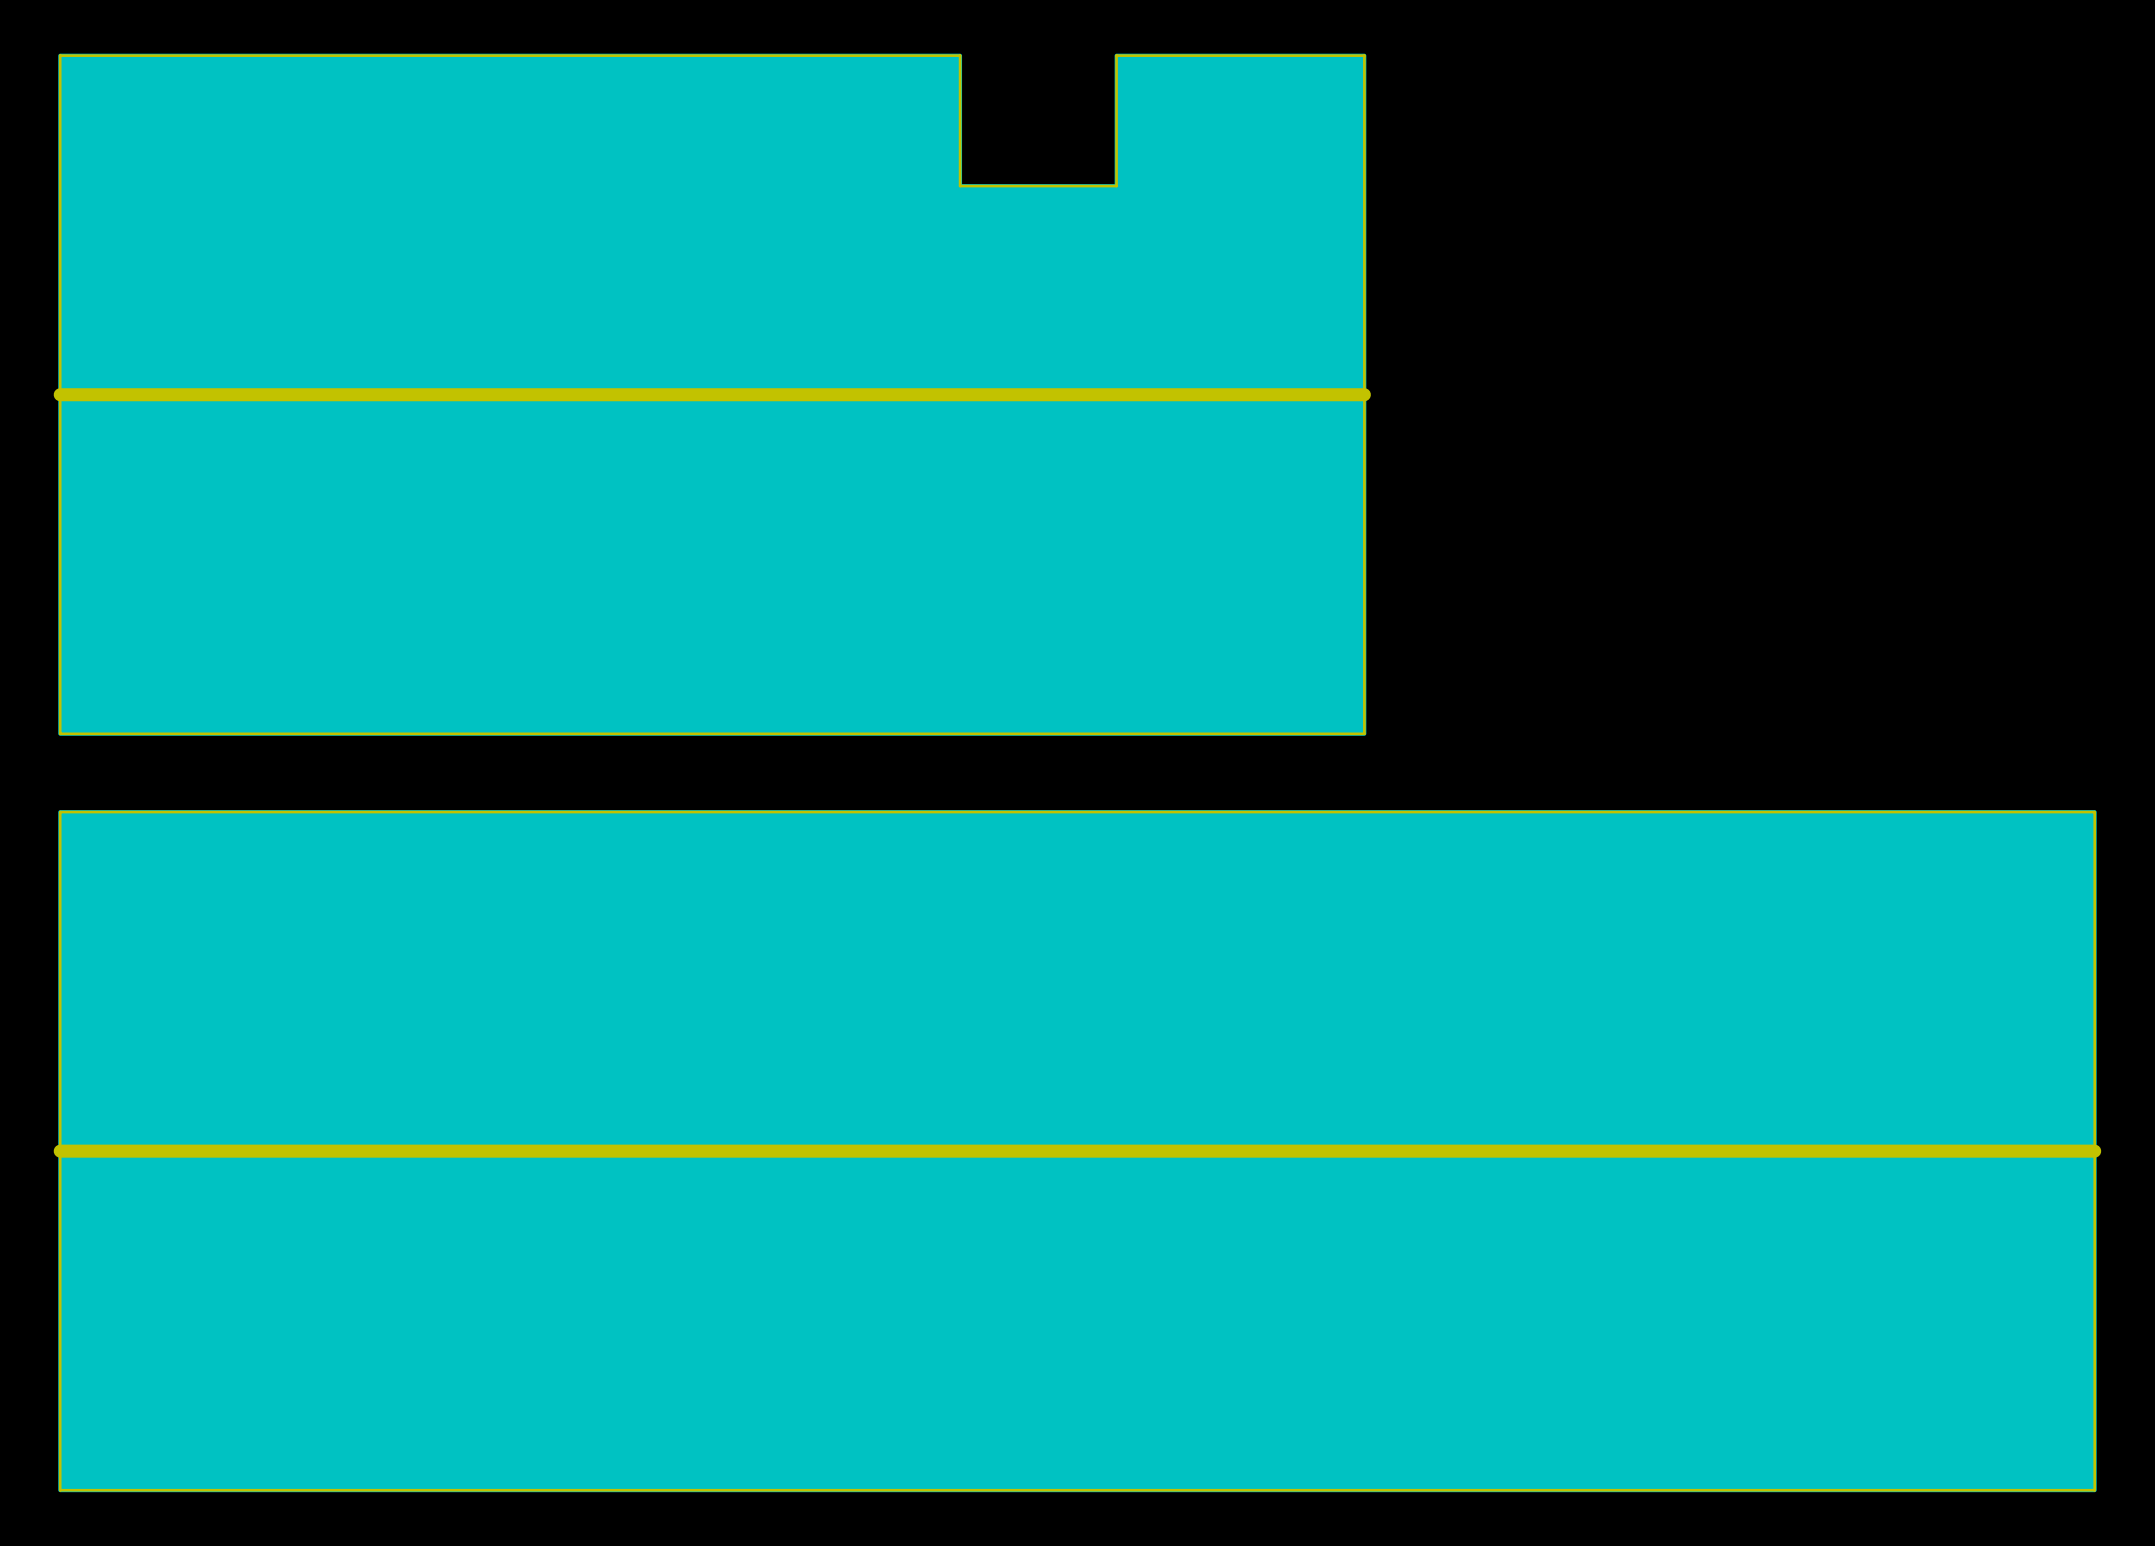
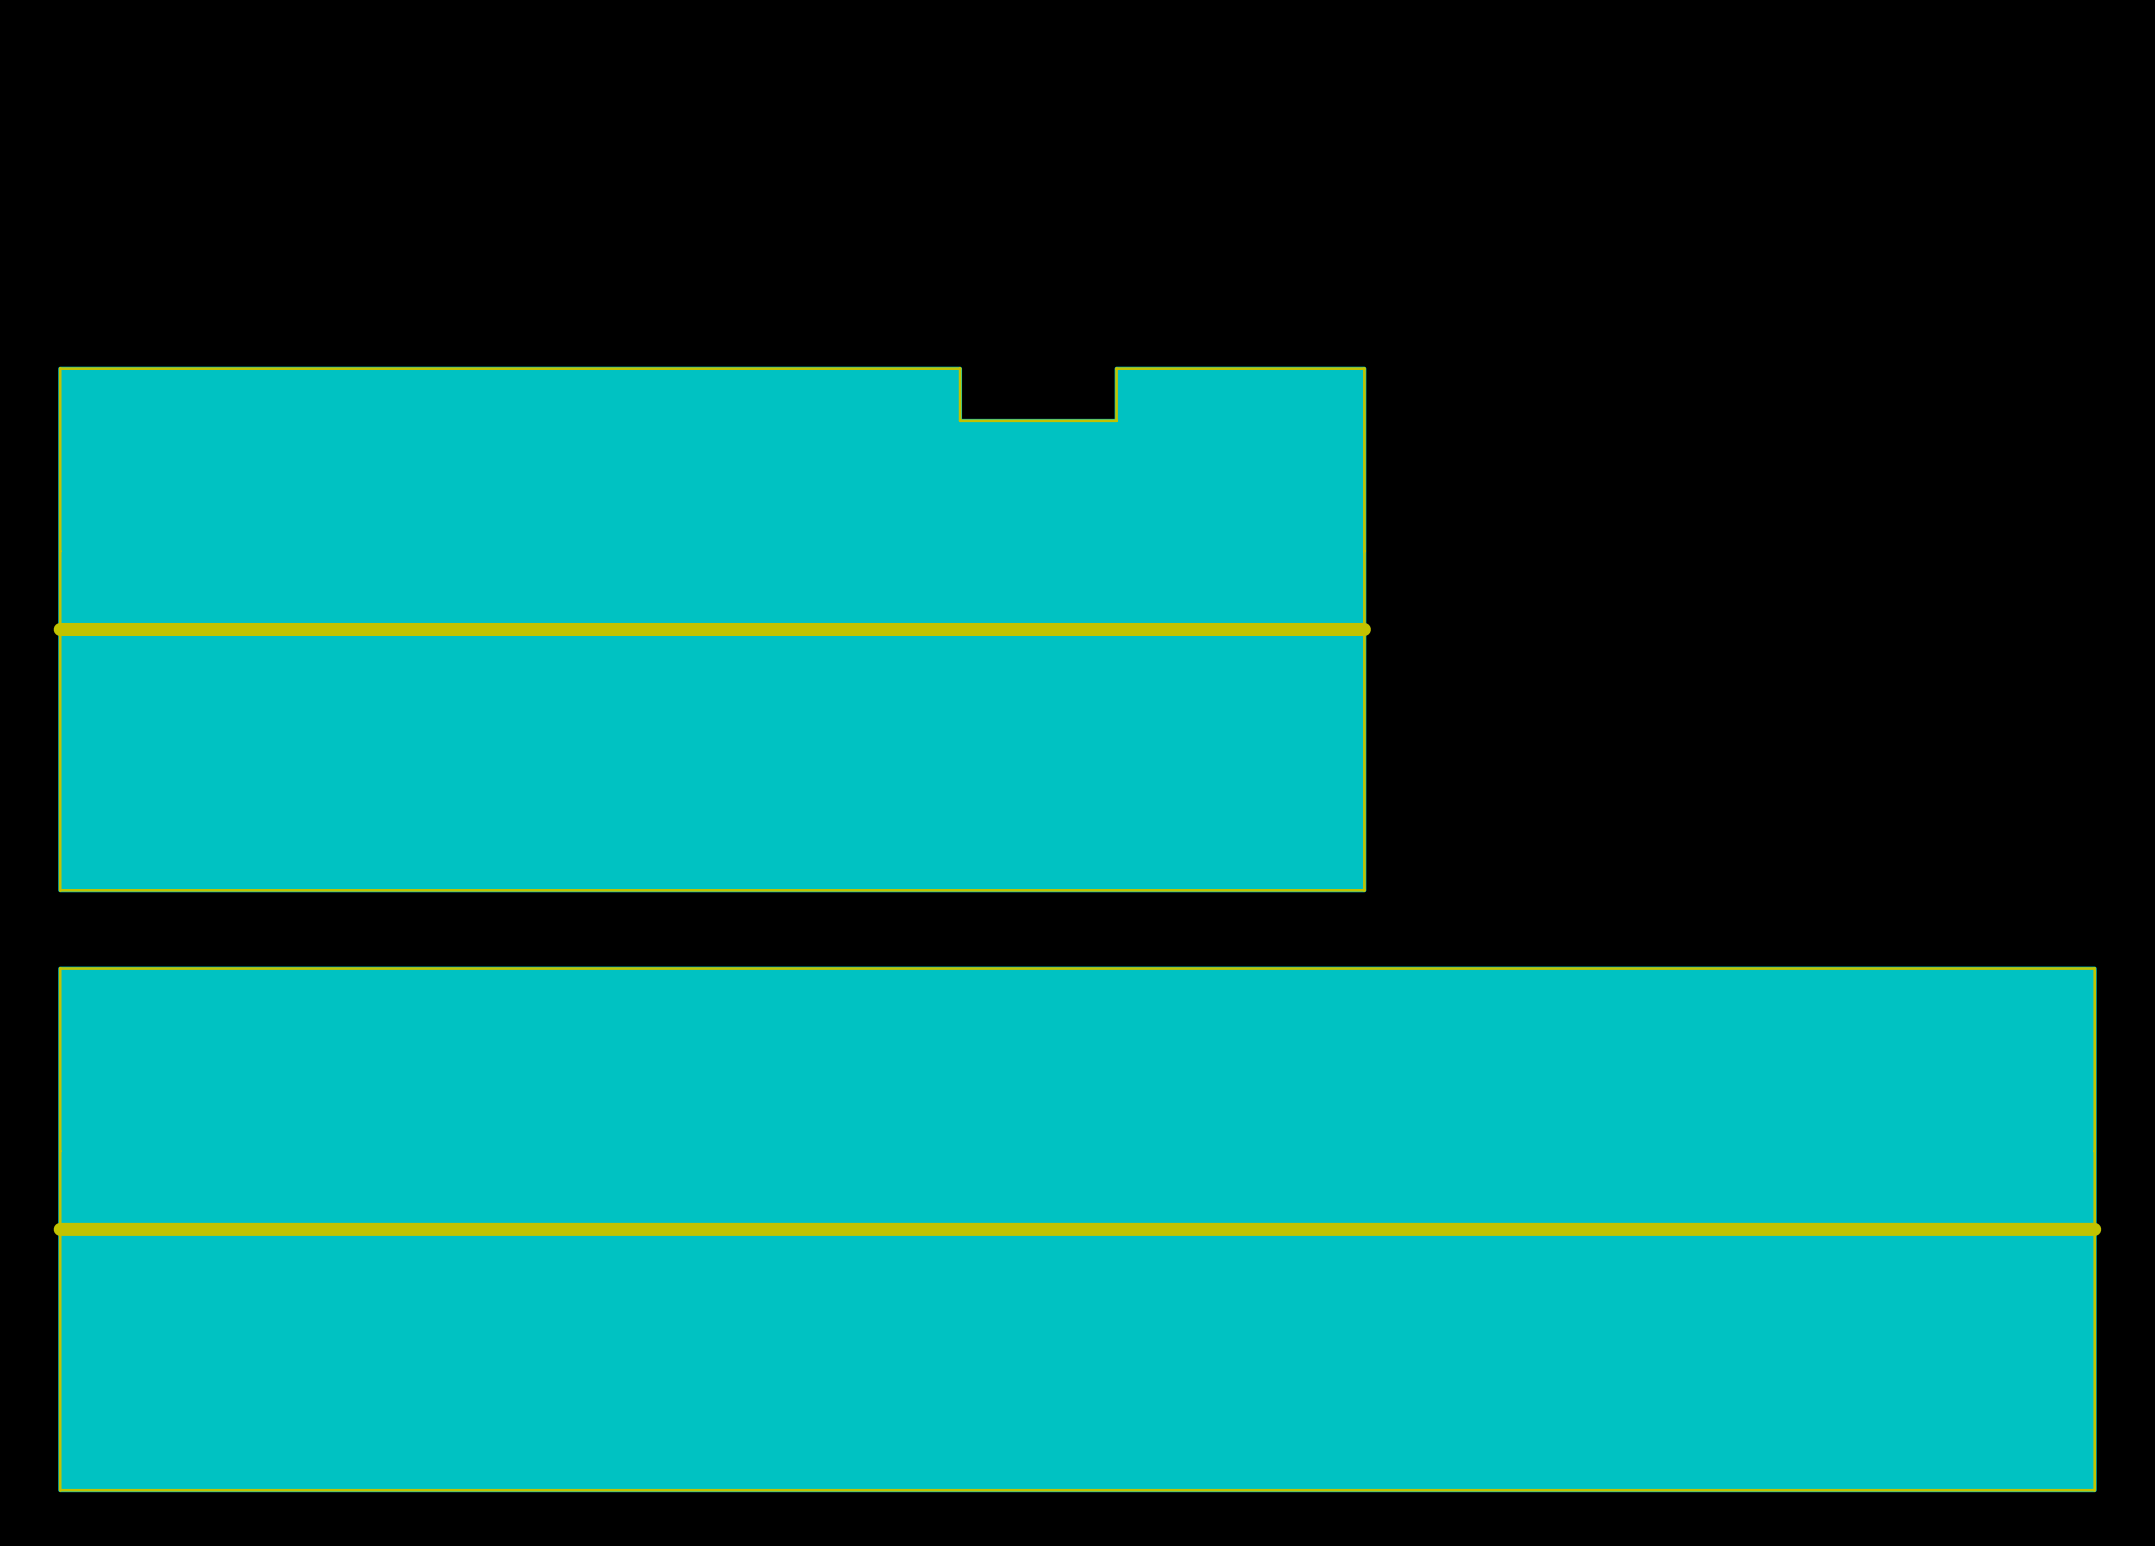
drawing: [58, 53, 1367, 736] -> none
drawing: none -> [58, 366, 1367, 893]
board edge: (60, 368) (60, 55) (960, 55) (960, 186) (1116, 186) (1116, 55) (1364, 55) (1364, 368) -> (60, 368) (960, 368) (960, 420) (1116, 420) (1116, 368) (1364, 368)
board edge: (60, 394) (1364, 394) -> (60, 629) (1364, 629)
board edge: (60, 733) (1364, 733) -> (60, 890) (1364, 890) (1364, 733)
drawing: [58, 810, 2097, 1493] -> none
board edge: (60, 812) (2094, 812) (2094, 968) -> (60, 968) (2094, 968)
board edge: (60, 890) (60, 968) -> (60, 733) (60, 812)
drawing: none -> [58, 966, 2097, 1493]
board edge: (60, 1151) (2094, 1151) -> (60, 1229) (2094, 1229)

